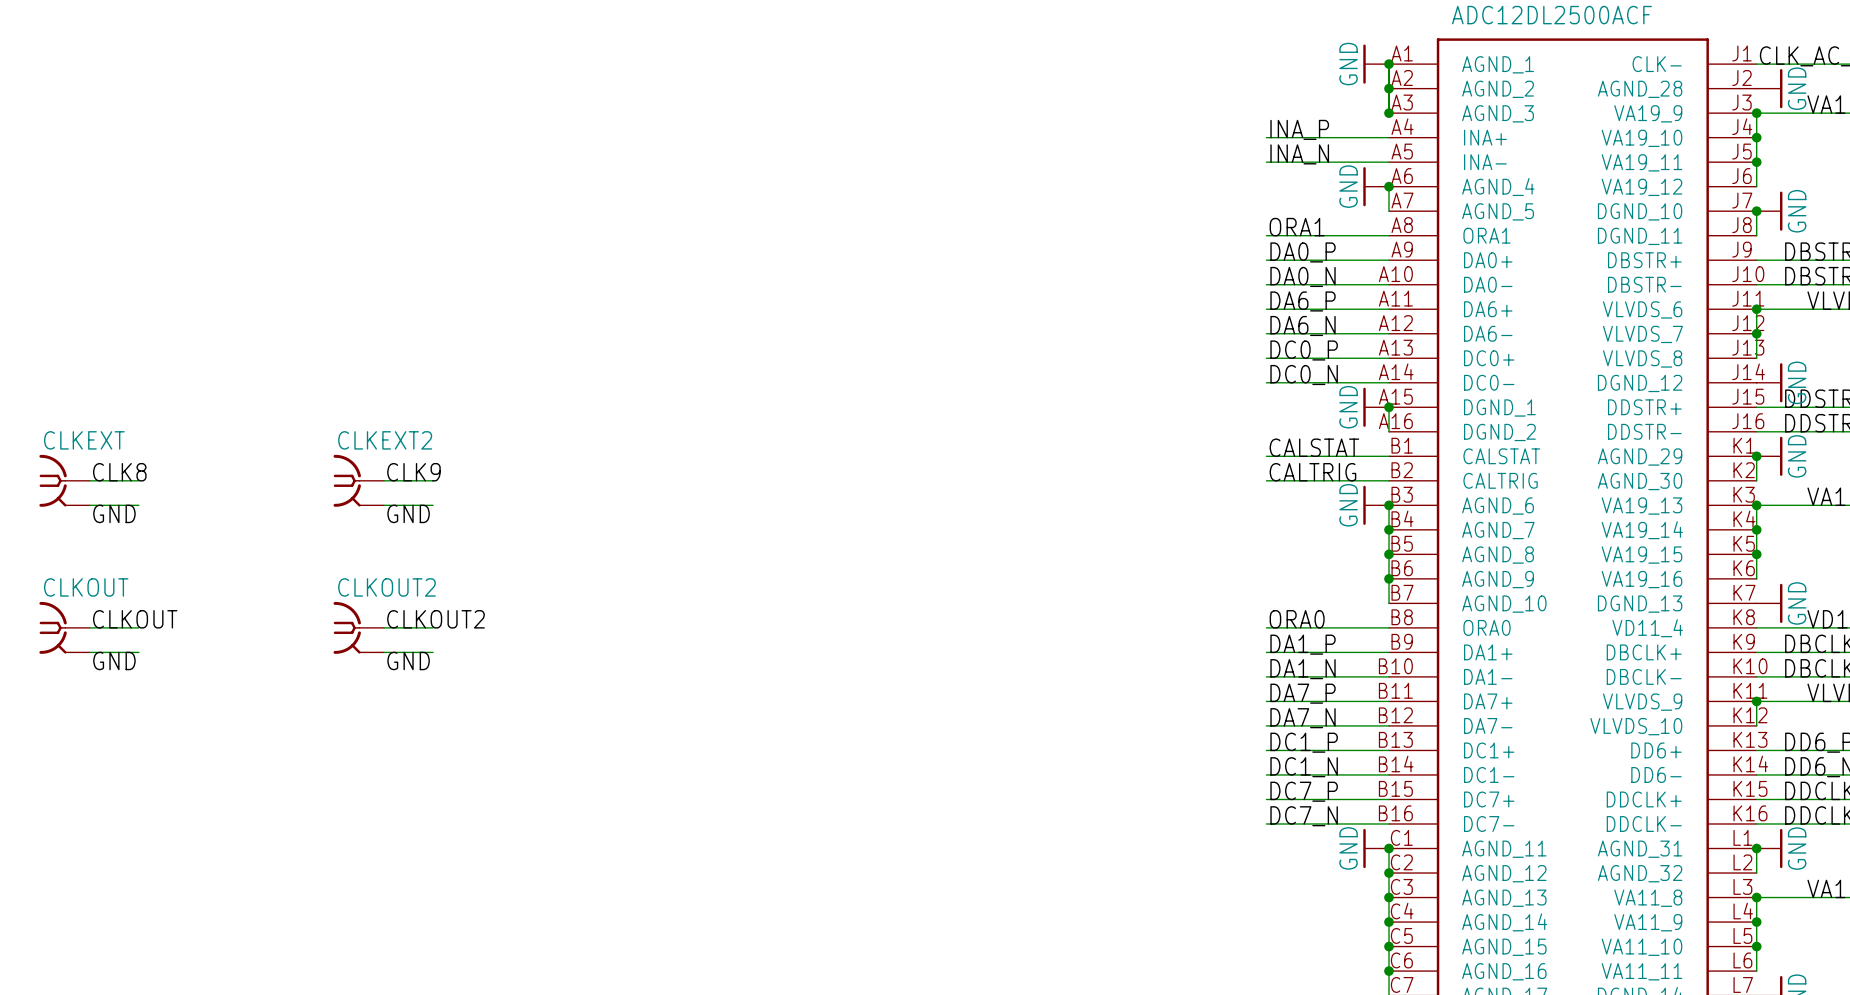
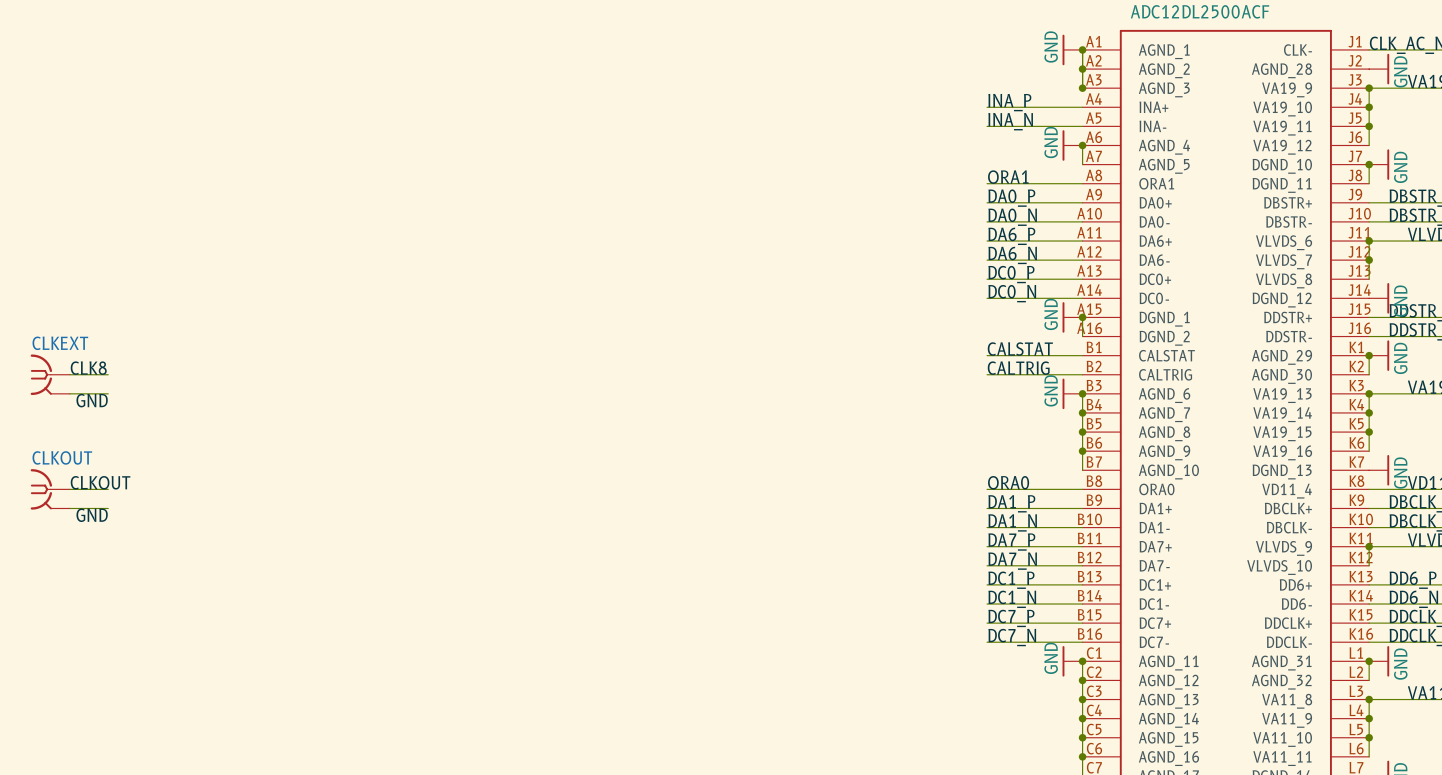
label: CLK9 (413, 472) -> none
CLKEXT2: (358, 480) -> none
wire: (384, 480) (433, 480) -> none
wire: (384, 505) (433, 505) -> none
label: GND (408, 513) -> none
label: CLKOUT2 (436, 619) -> none
CLKOUT2: (358, 627) -> none
wire: (384, 627) (433, 627) -> none
wire: (384, 652) (433, 652) -> none
label: GND (408, 660) -> none

